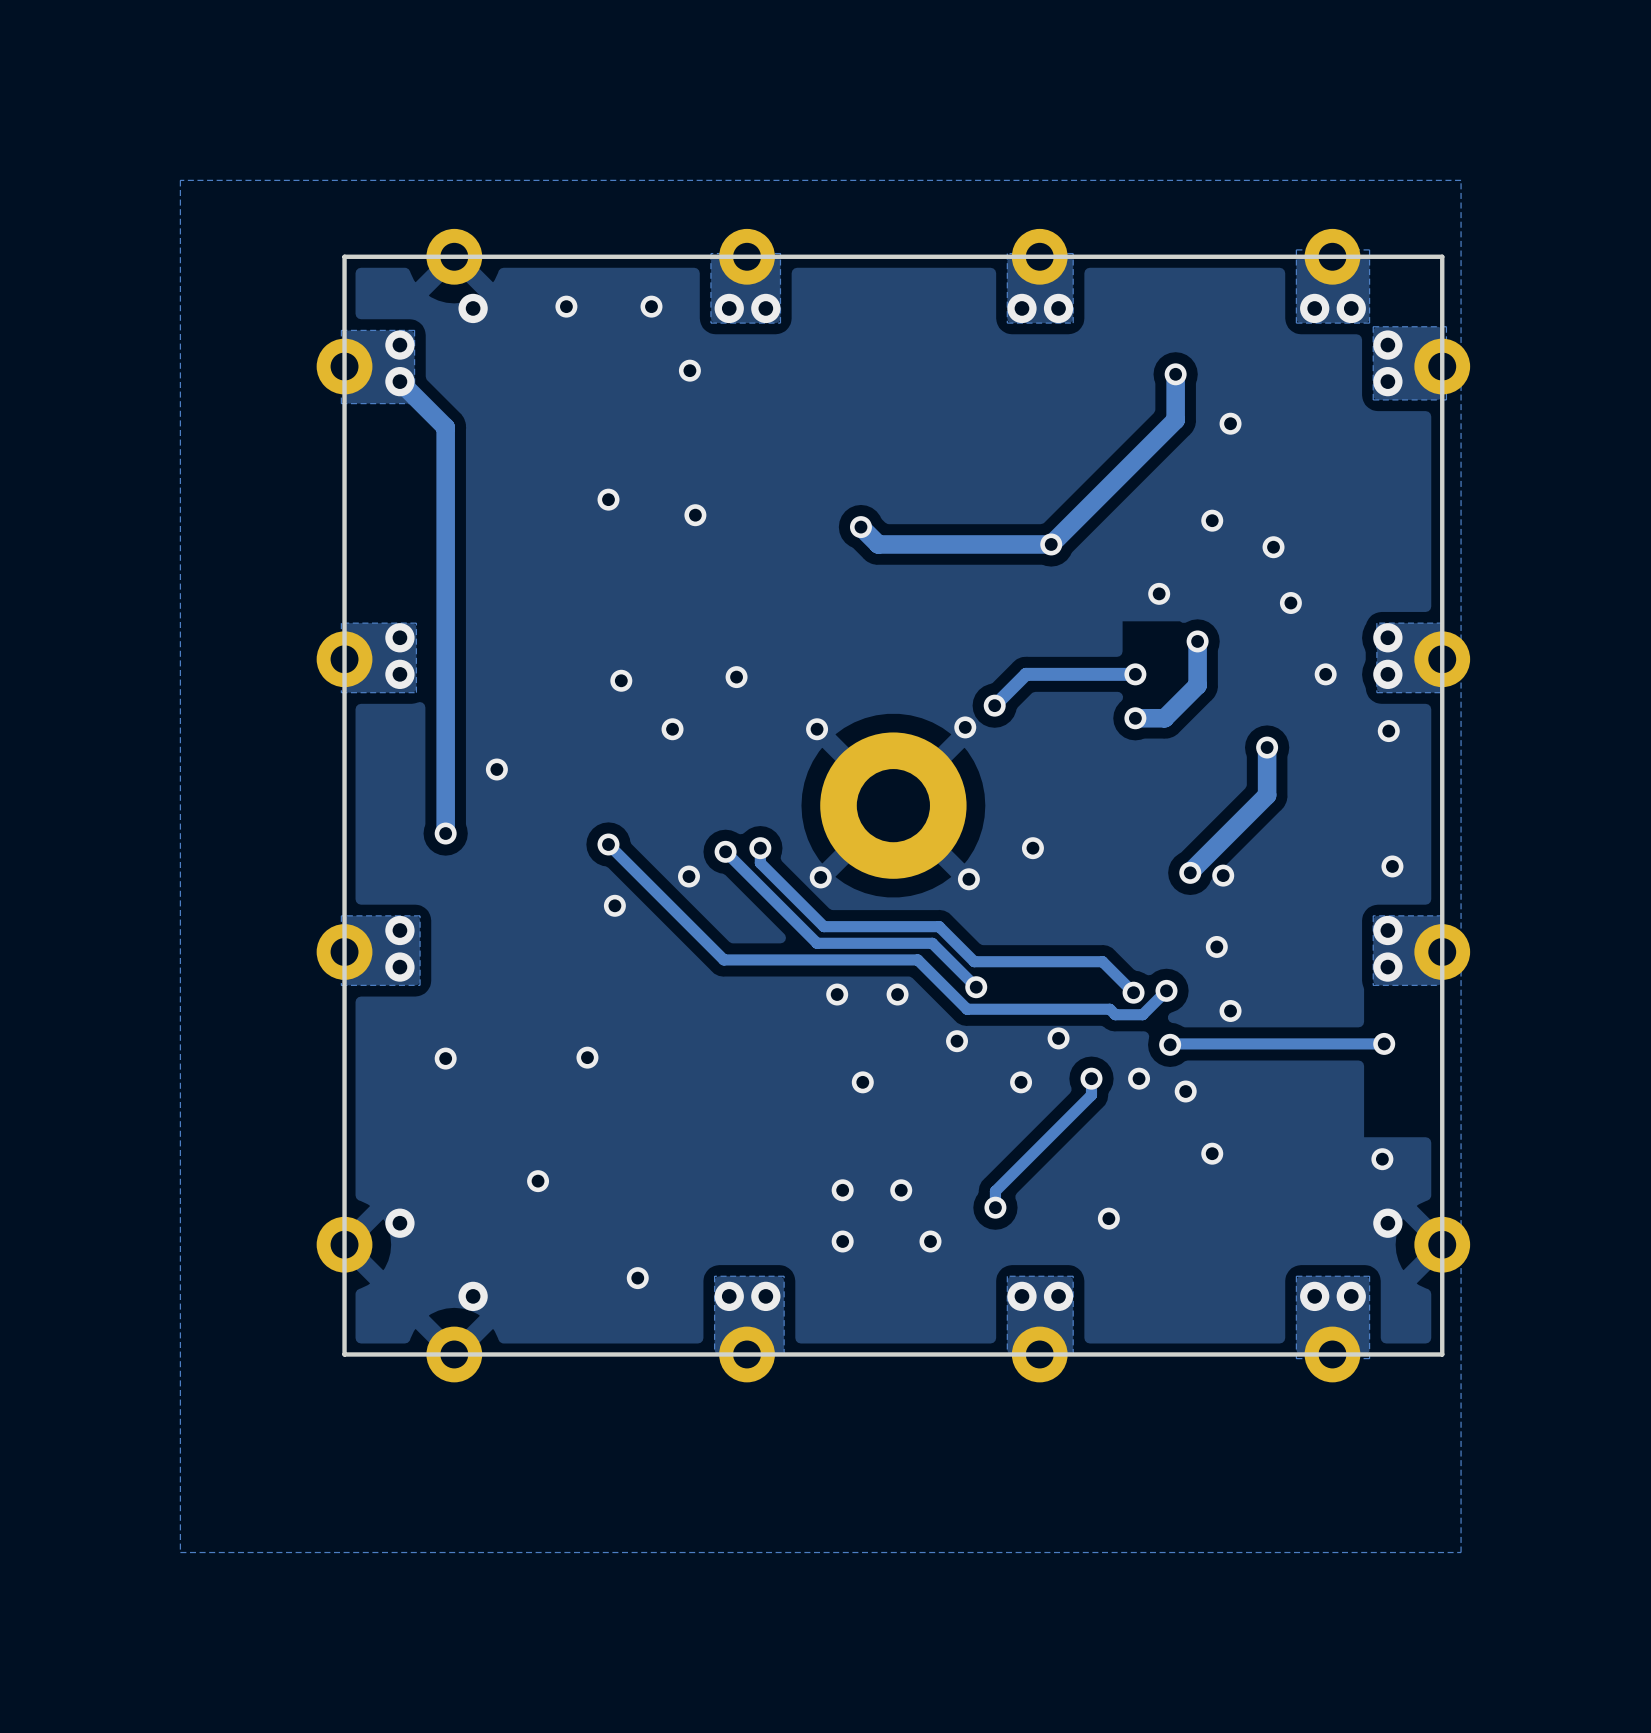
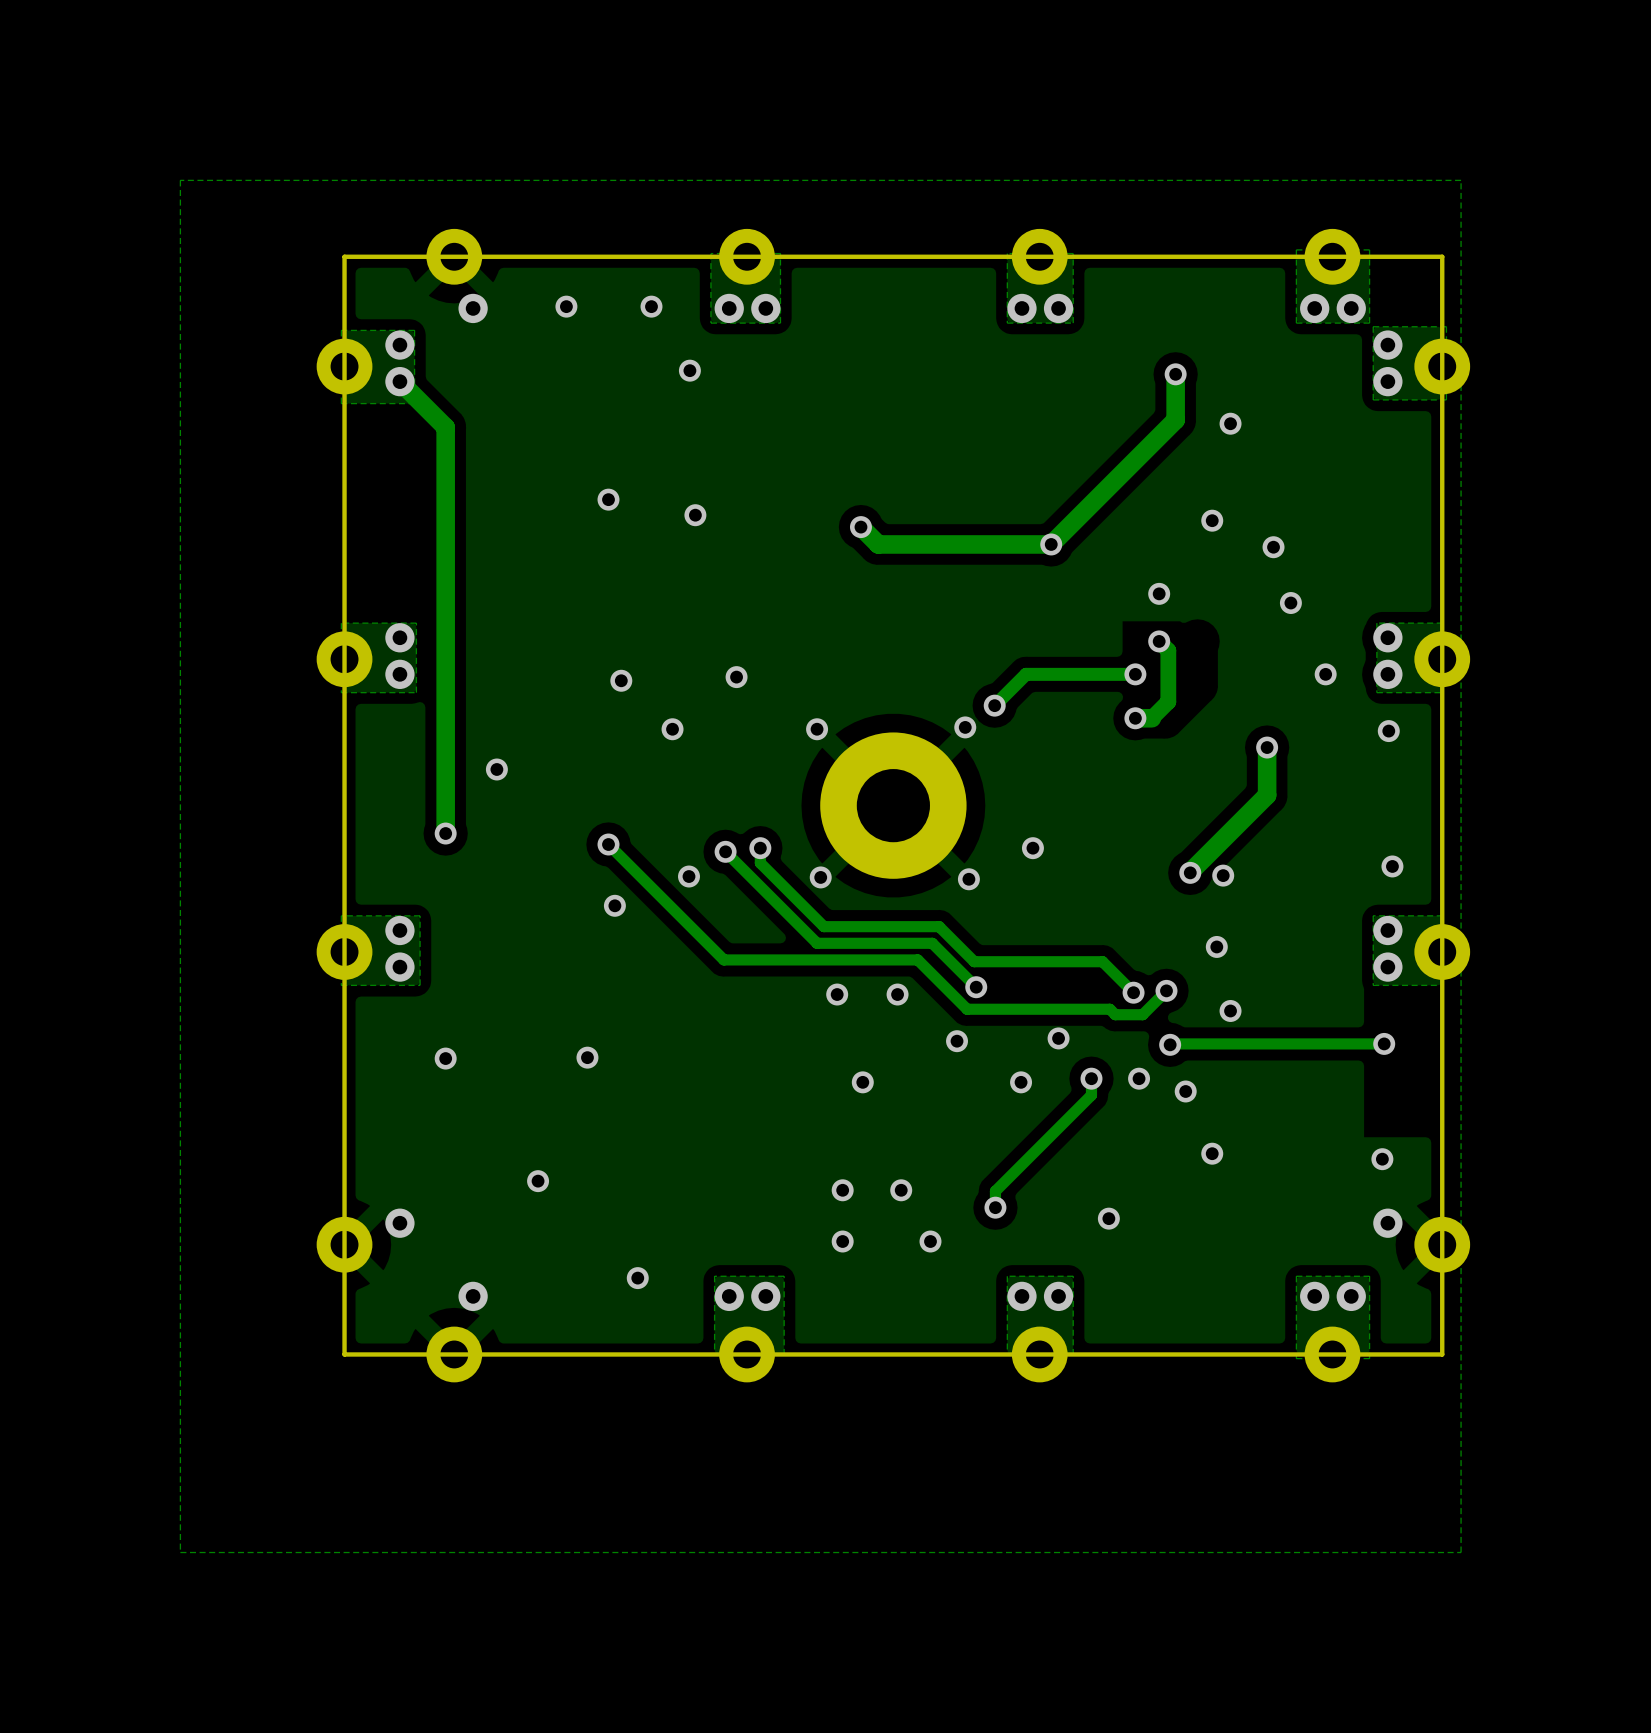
track: (1197, 641) (1197, 685) (1164, 718) (1151, 718) -> (1159, 641) (1168, 650) (1168, 701) (1151, 718)
via position: (1197, 641) -> (1159, 641)

